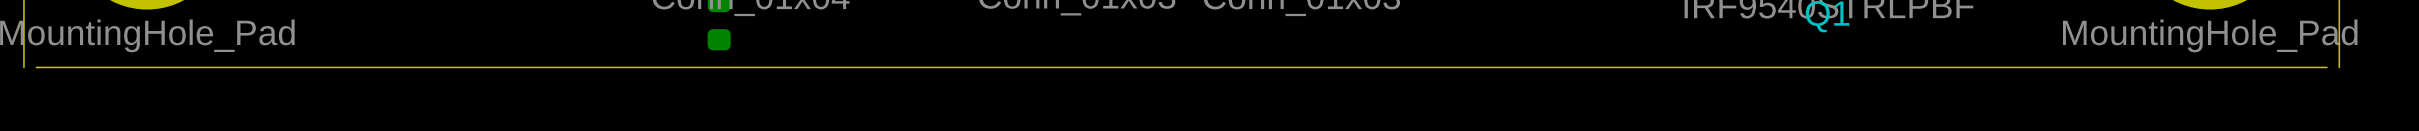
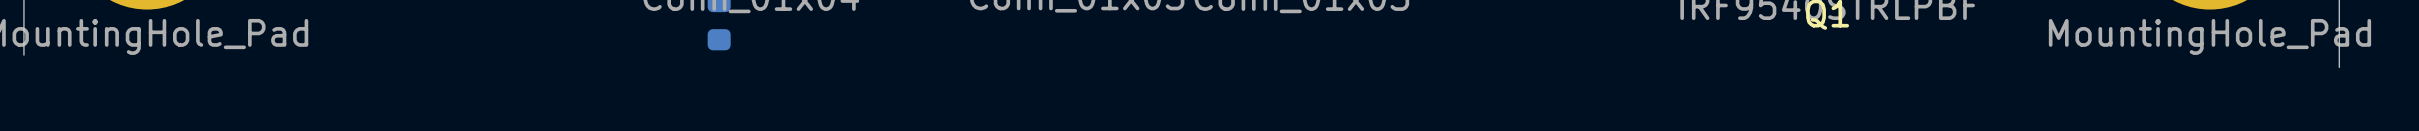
board edge: (23, 55) (23, 67) -> none
board edge: (36, 67) (2326, 67) -> none

